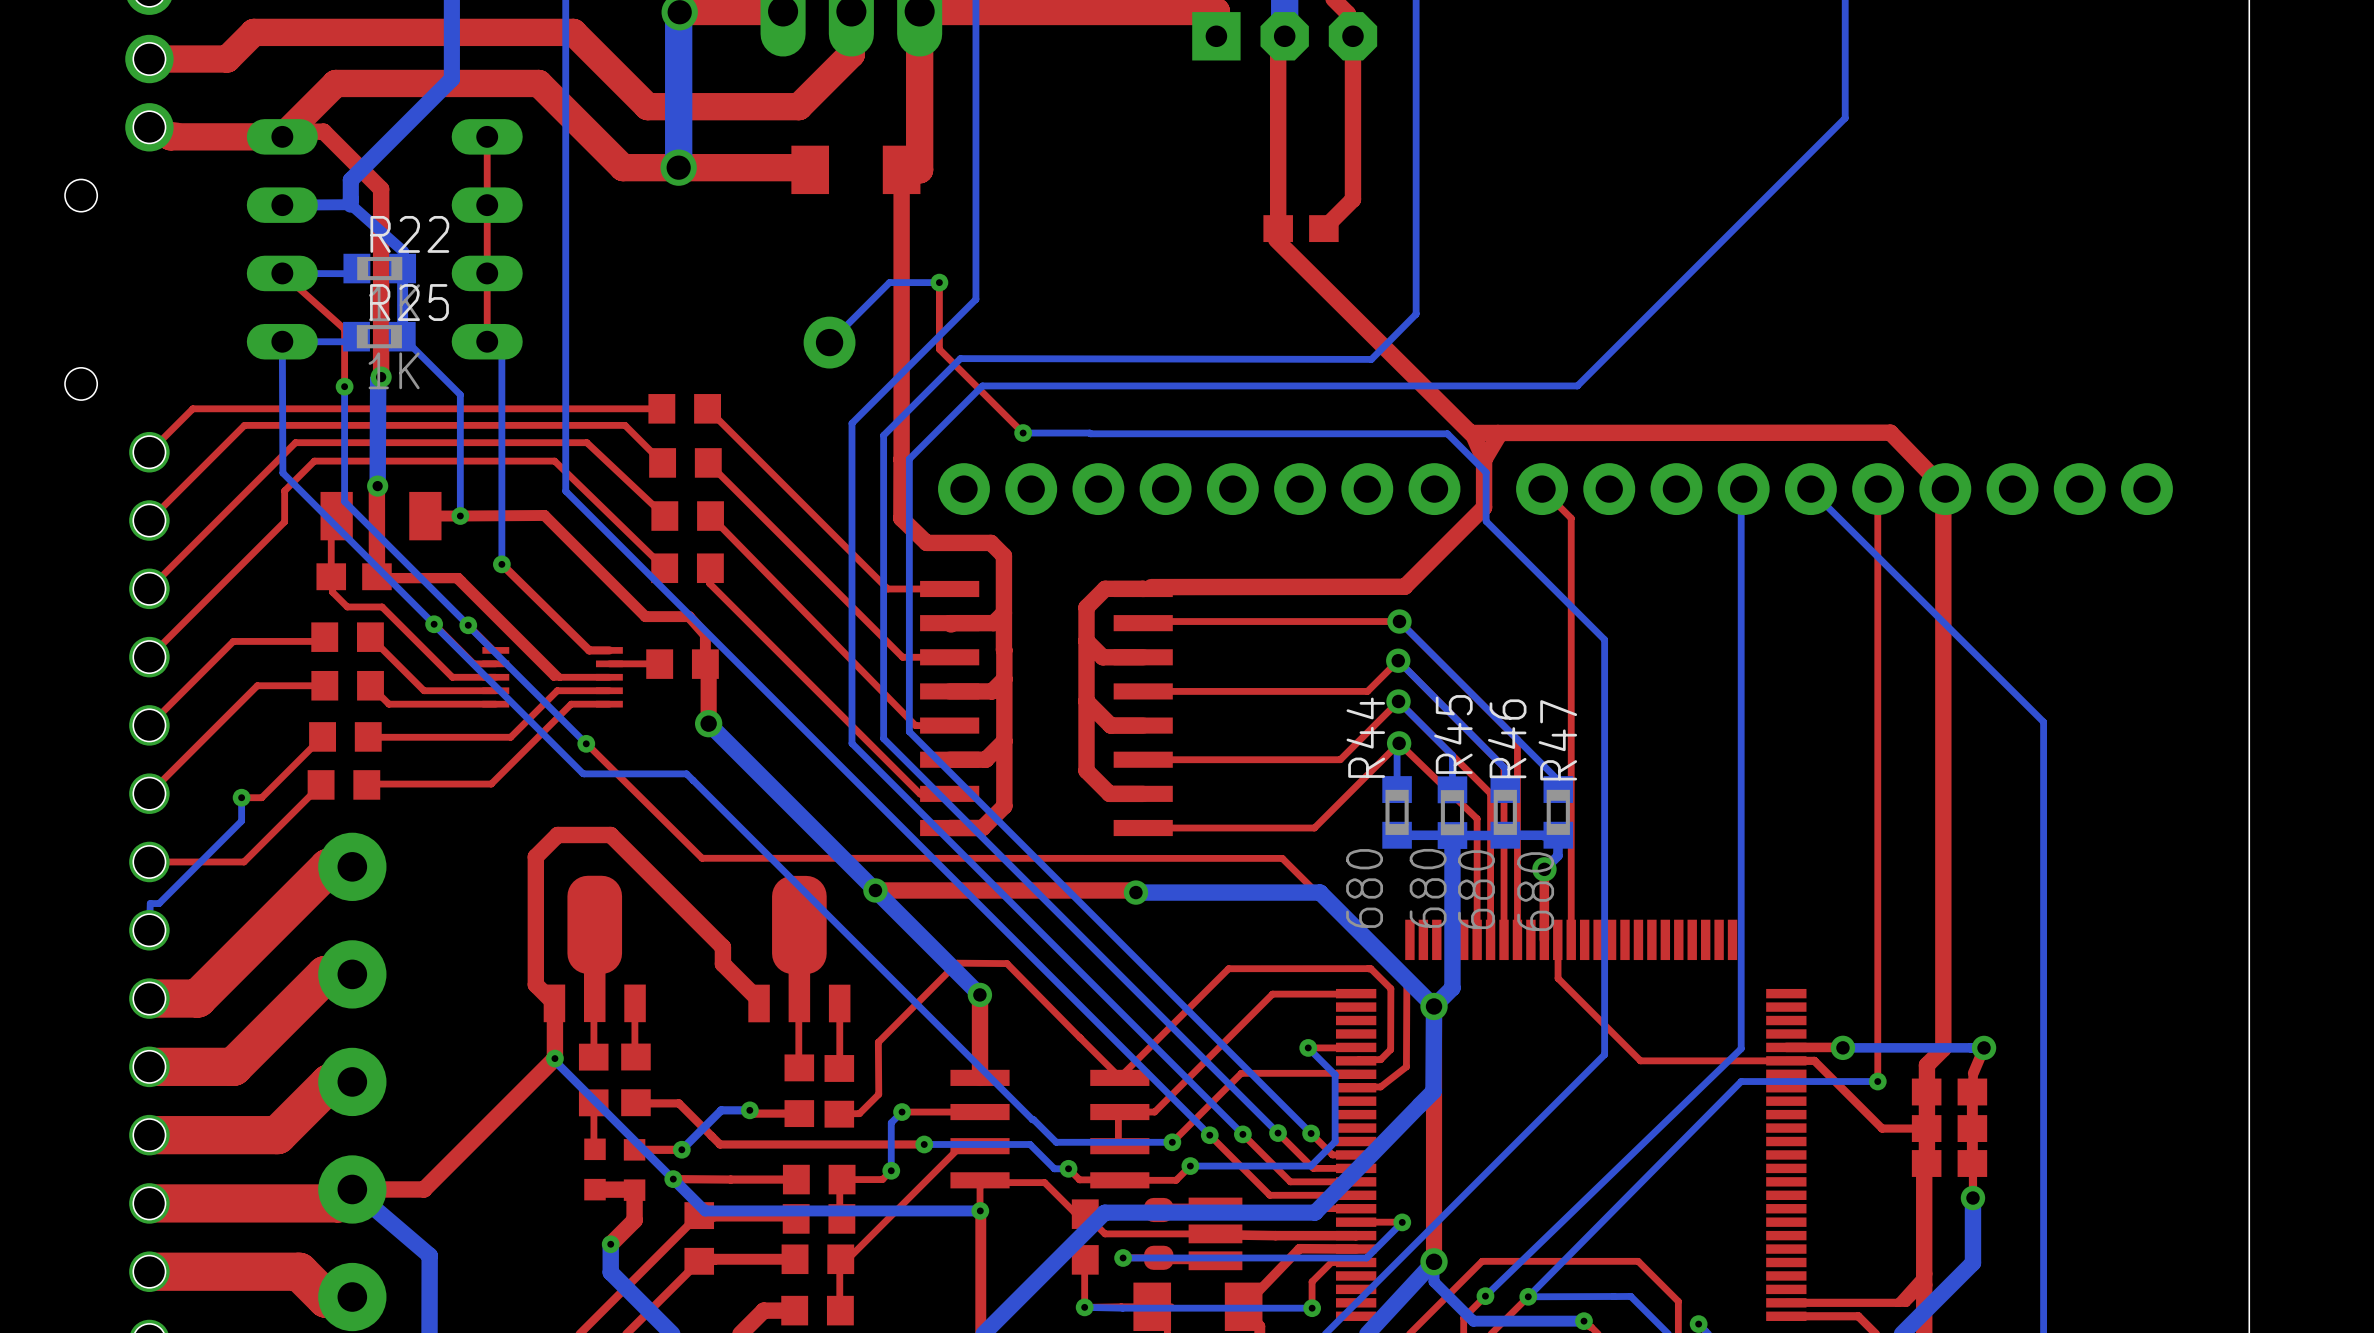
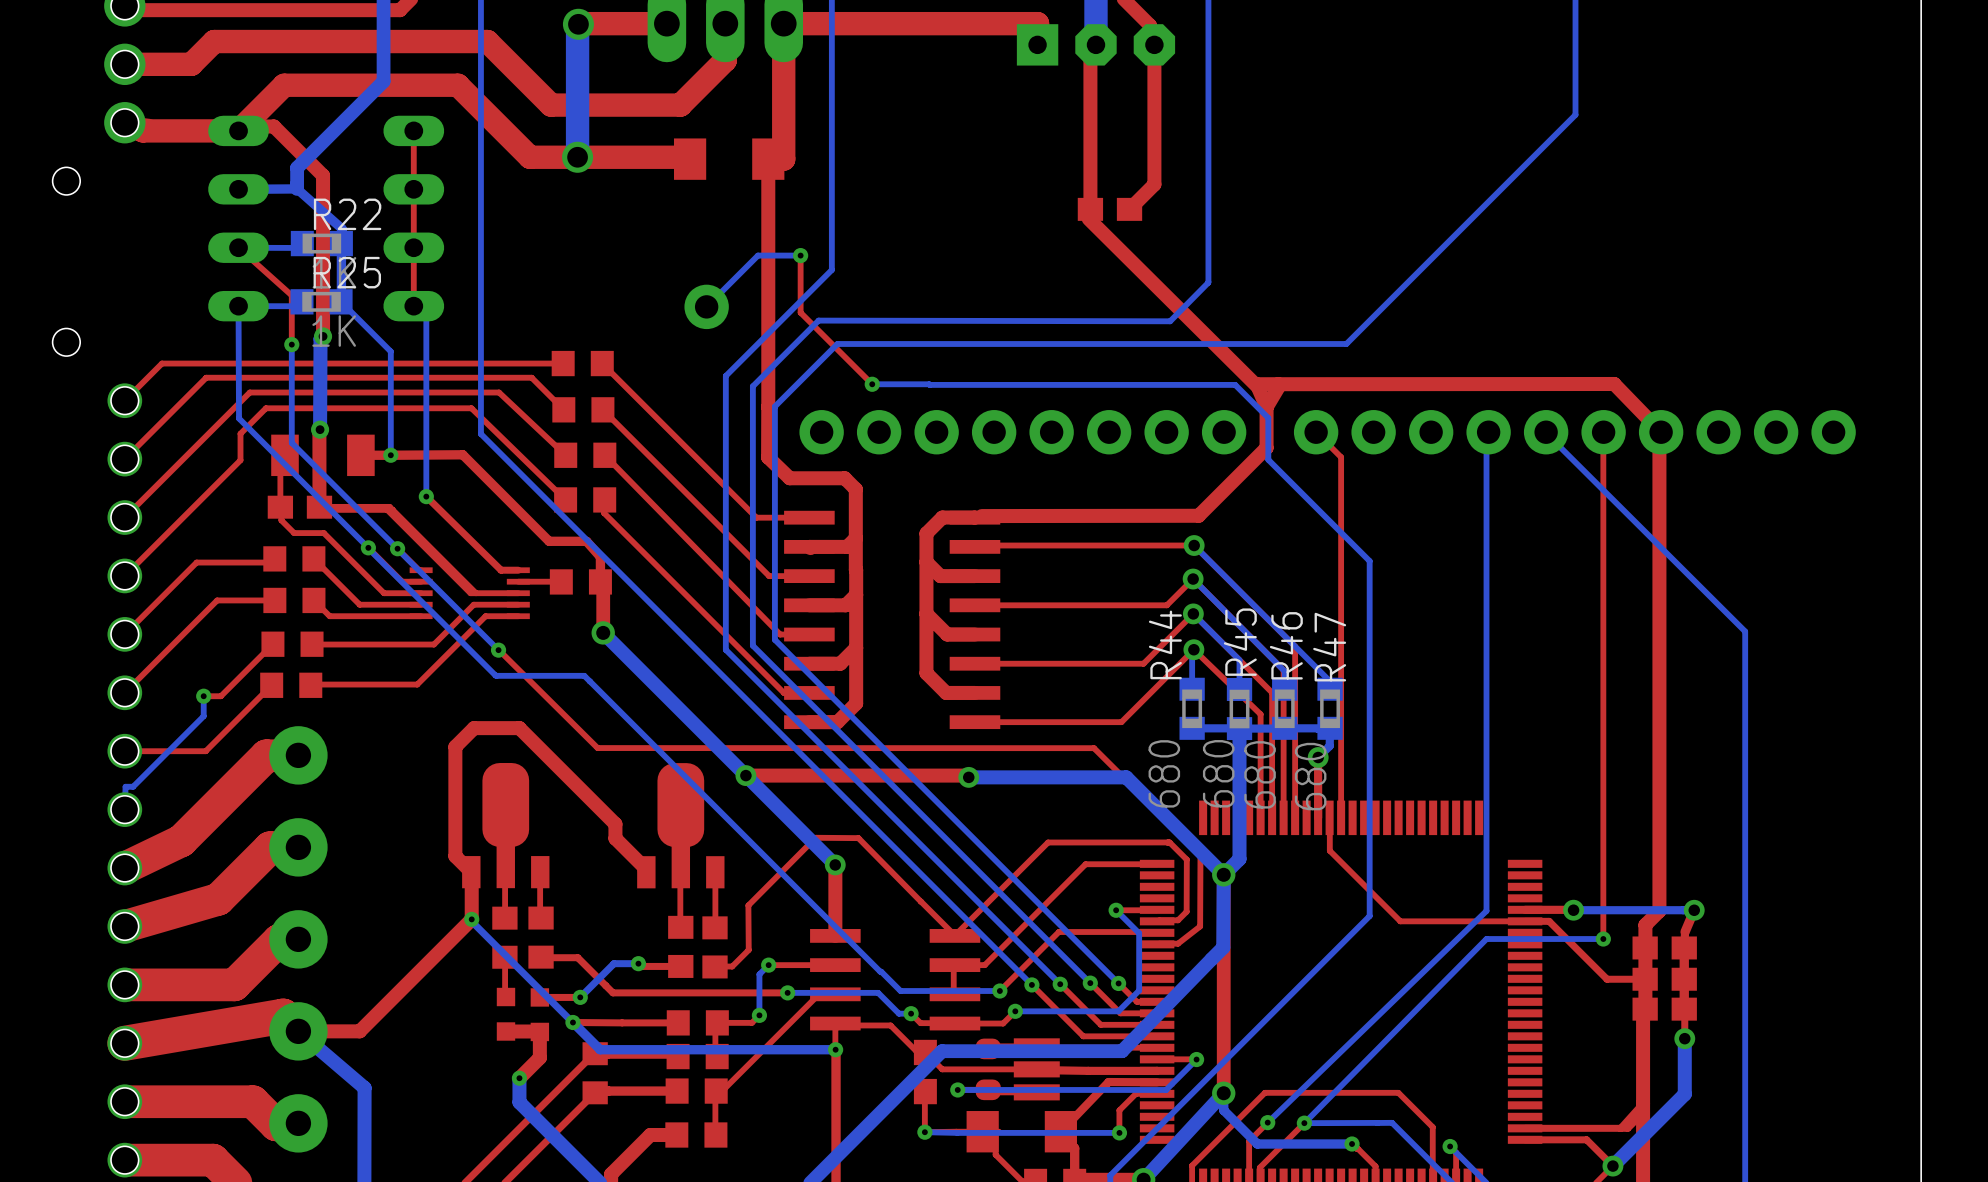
top track: (351, 867) (328, 867) (197, 998) (149, 998) -> (298, 755) (266, 755) (181, 840) (124, 868)
top track: (351, 974) (325, 974) (233, 1066) (149, 1066) -> (298, 847) (270, 847) (218, 899) (124, 926)
top track: (352, 1189) (338, 1203) (149, 1203) -> (298, 1031) (283, 1016) (124, 1043)

